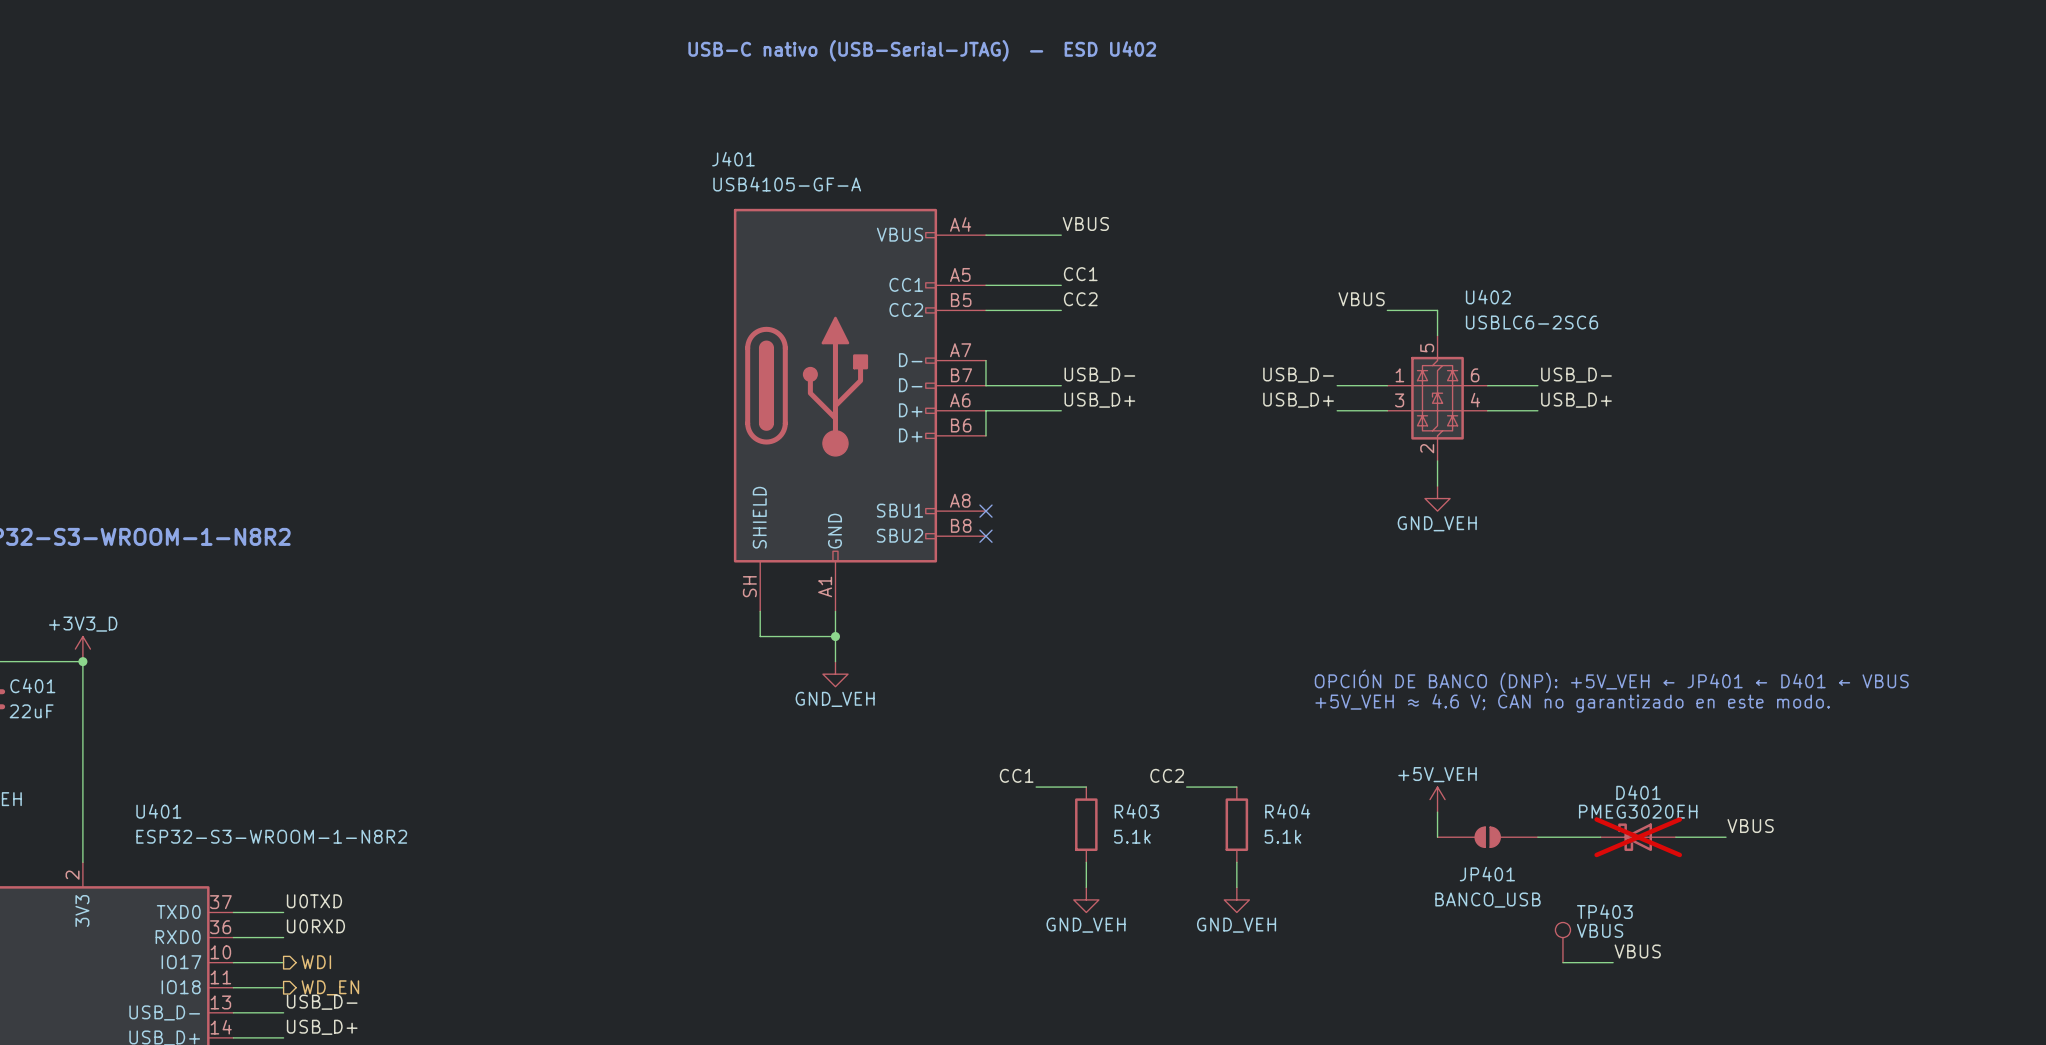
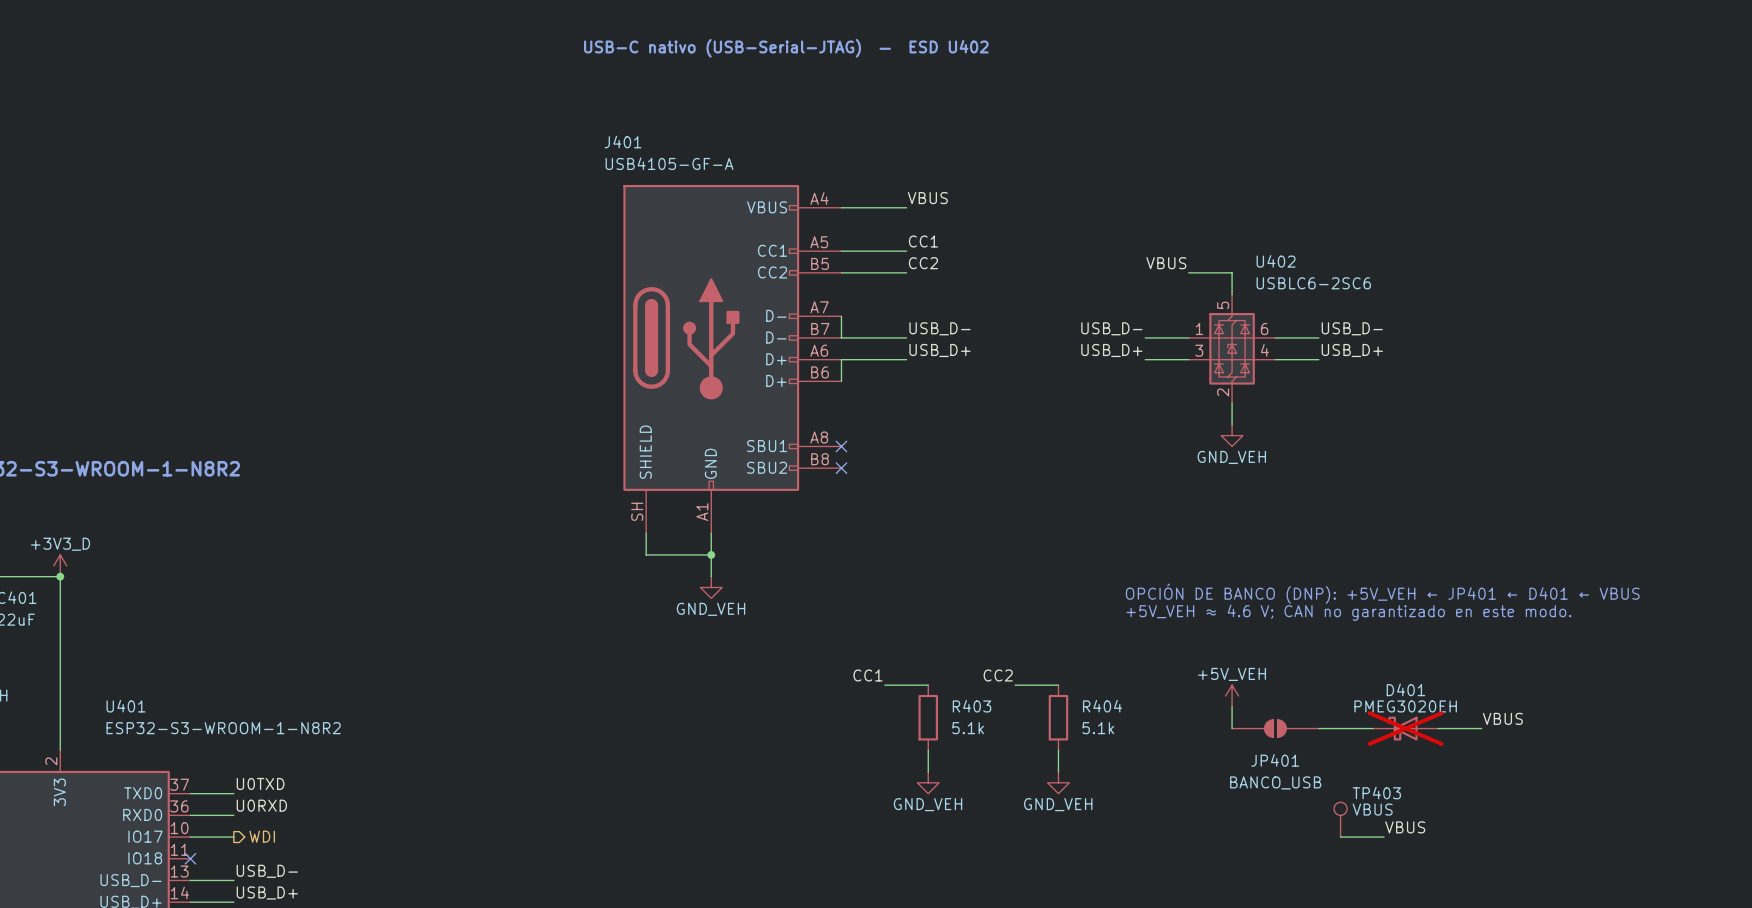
wire: (233, 987) (283, 987) -> none
no-connect mark: none -> (190, 858)
hierarchical label: WD_EN (330, 987) -> none

